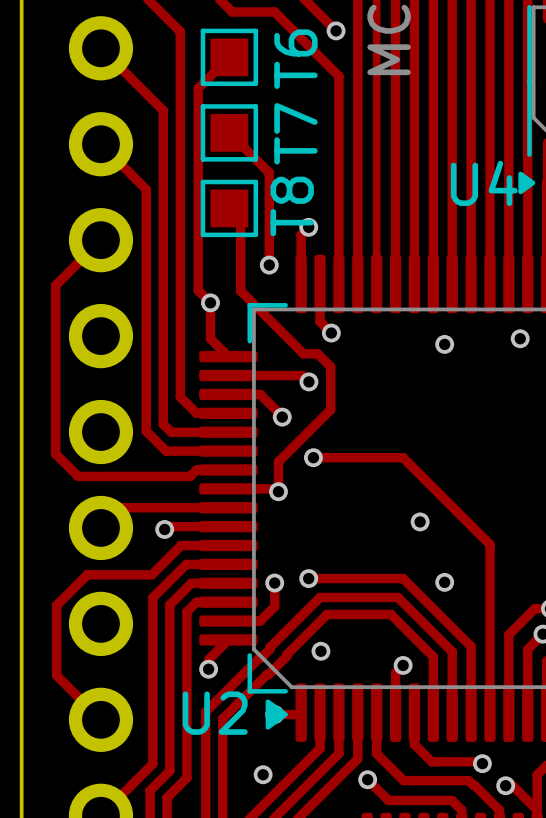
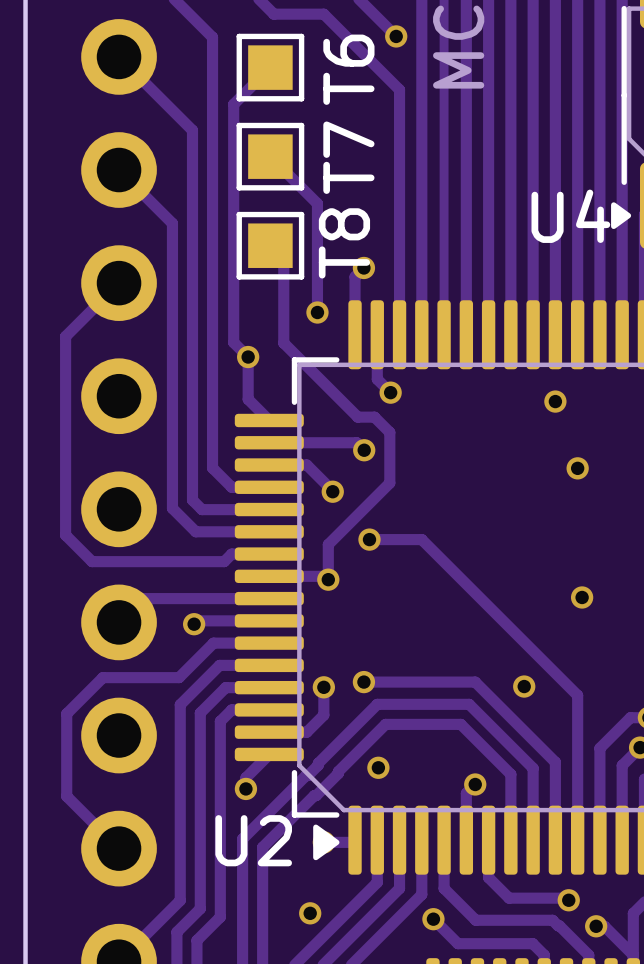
via: (520, 338) -> none
via: none -> (555, 401)
via: (444, 344) -> none
via: none -> (577, 468)
track: (357, 457) (403, 457) (490, 544) (490, 589) -> (421, 539) (577, 695)
via: none -> (582, 597)
via: (420, 521) -> none

